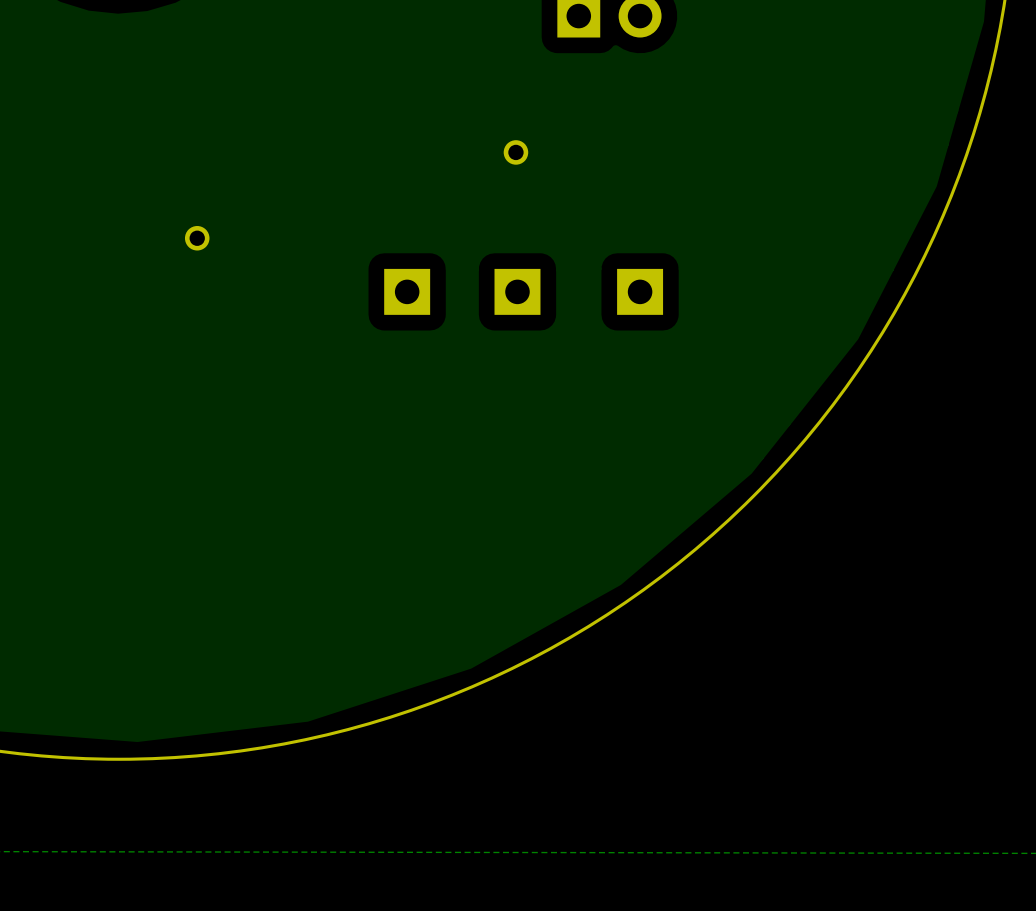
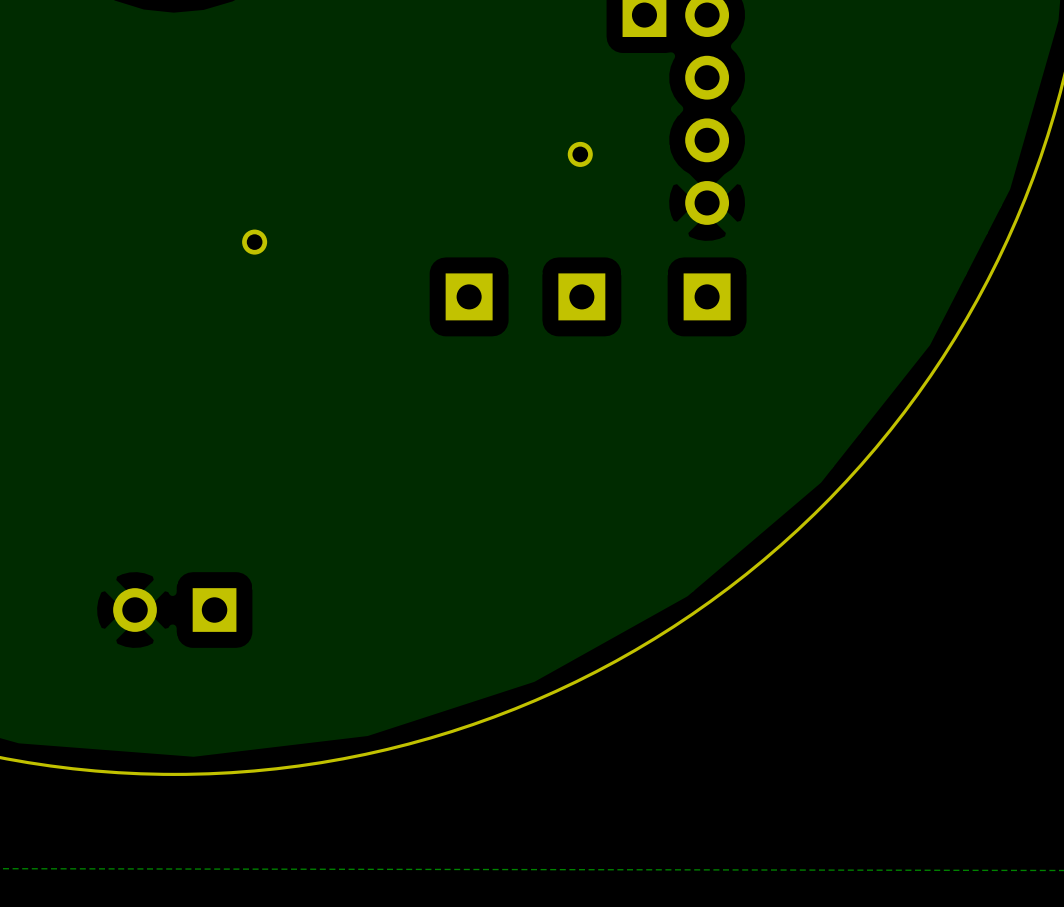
part: none -> (707, 140)
part: none -> (174, 610)

